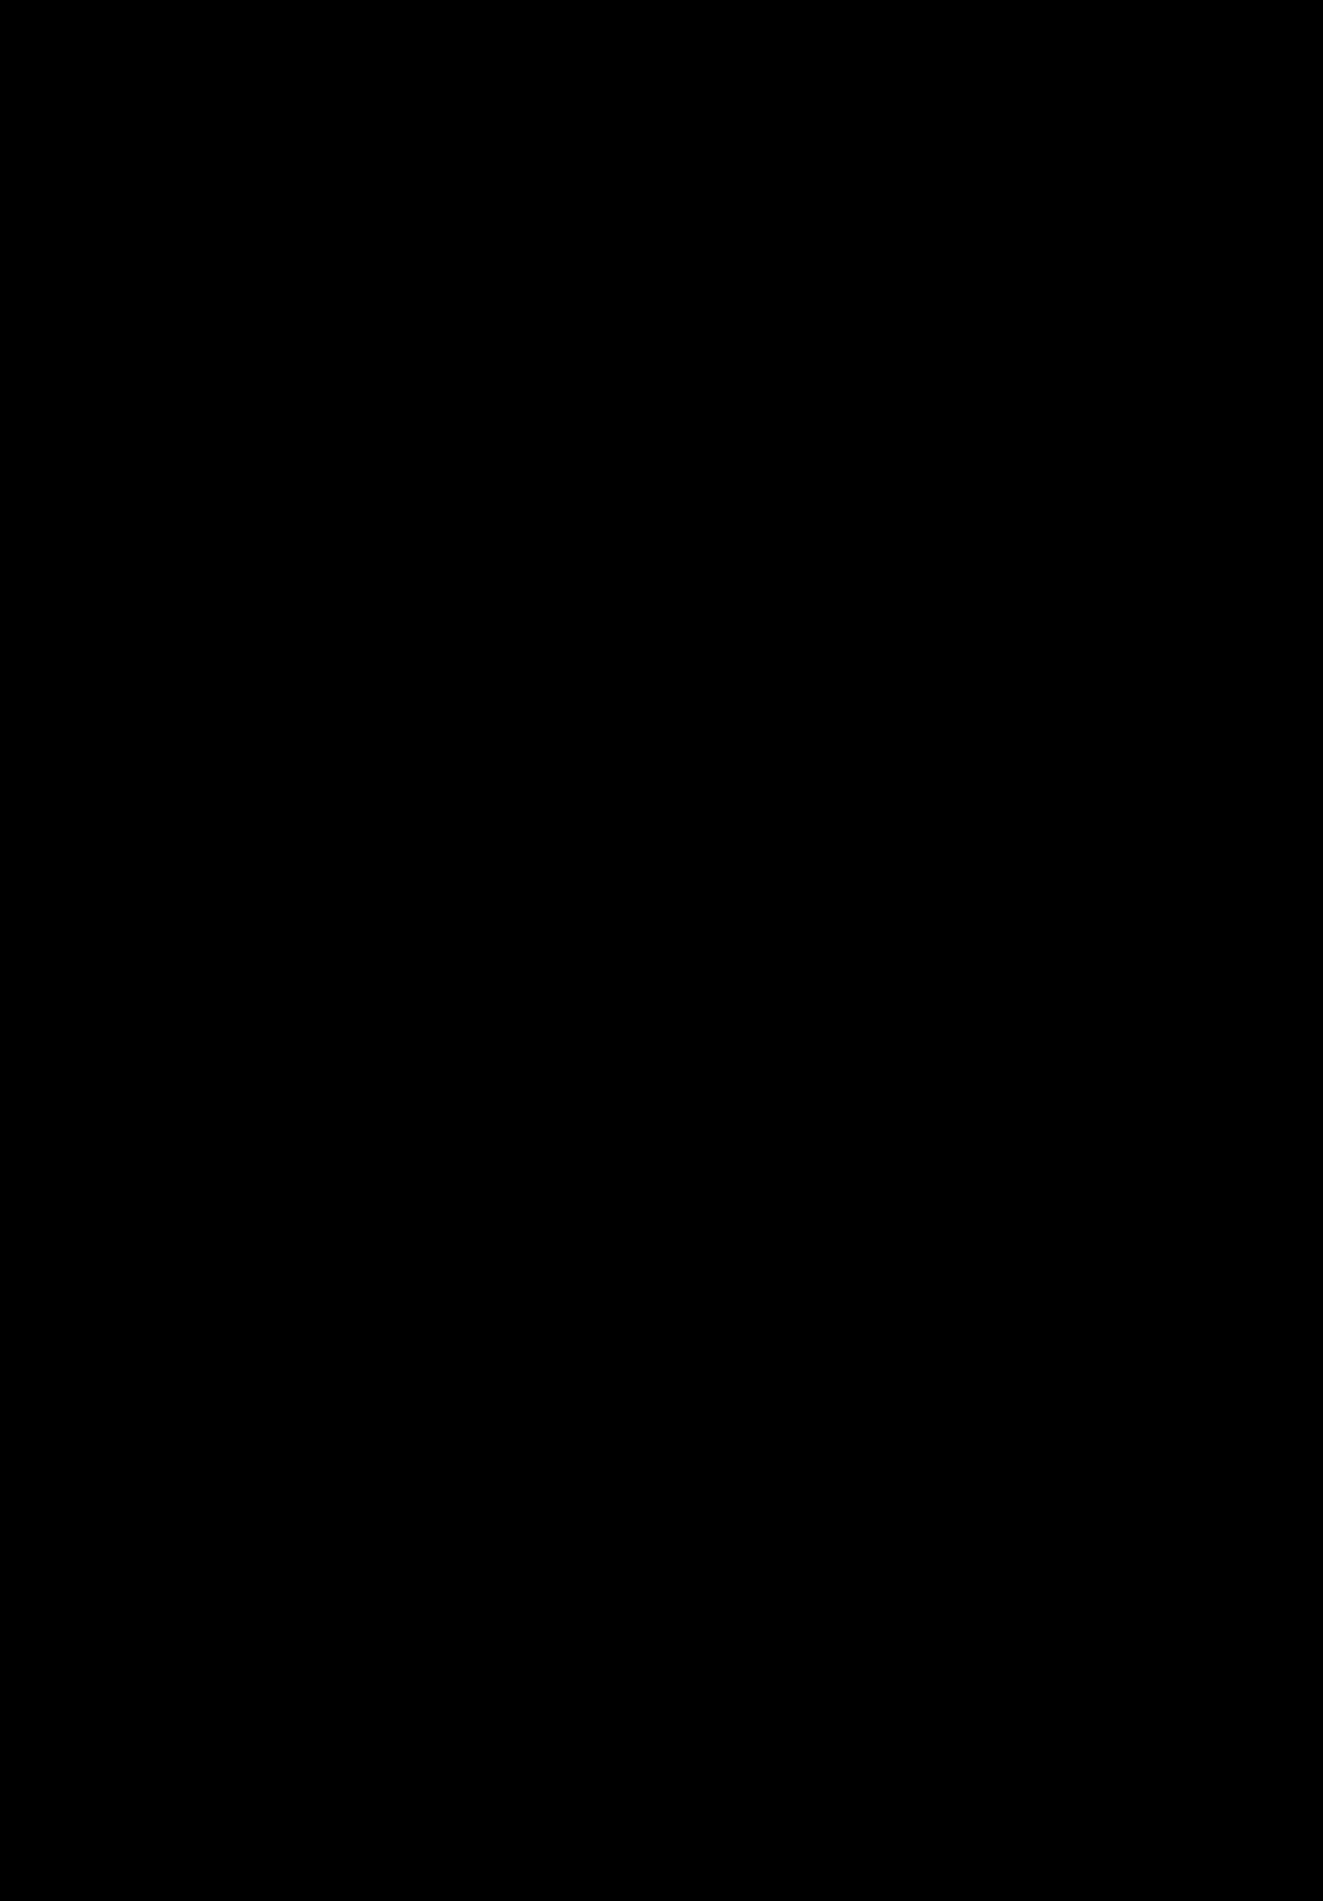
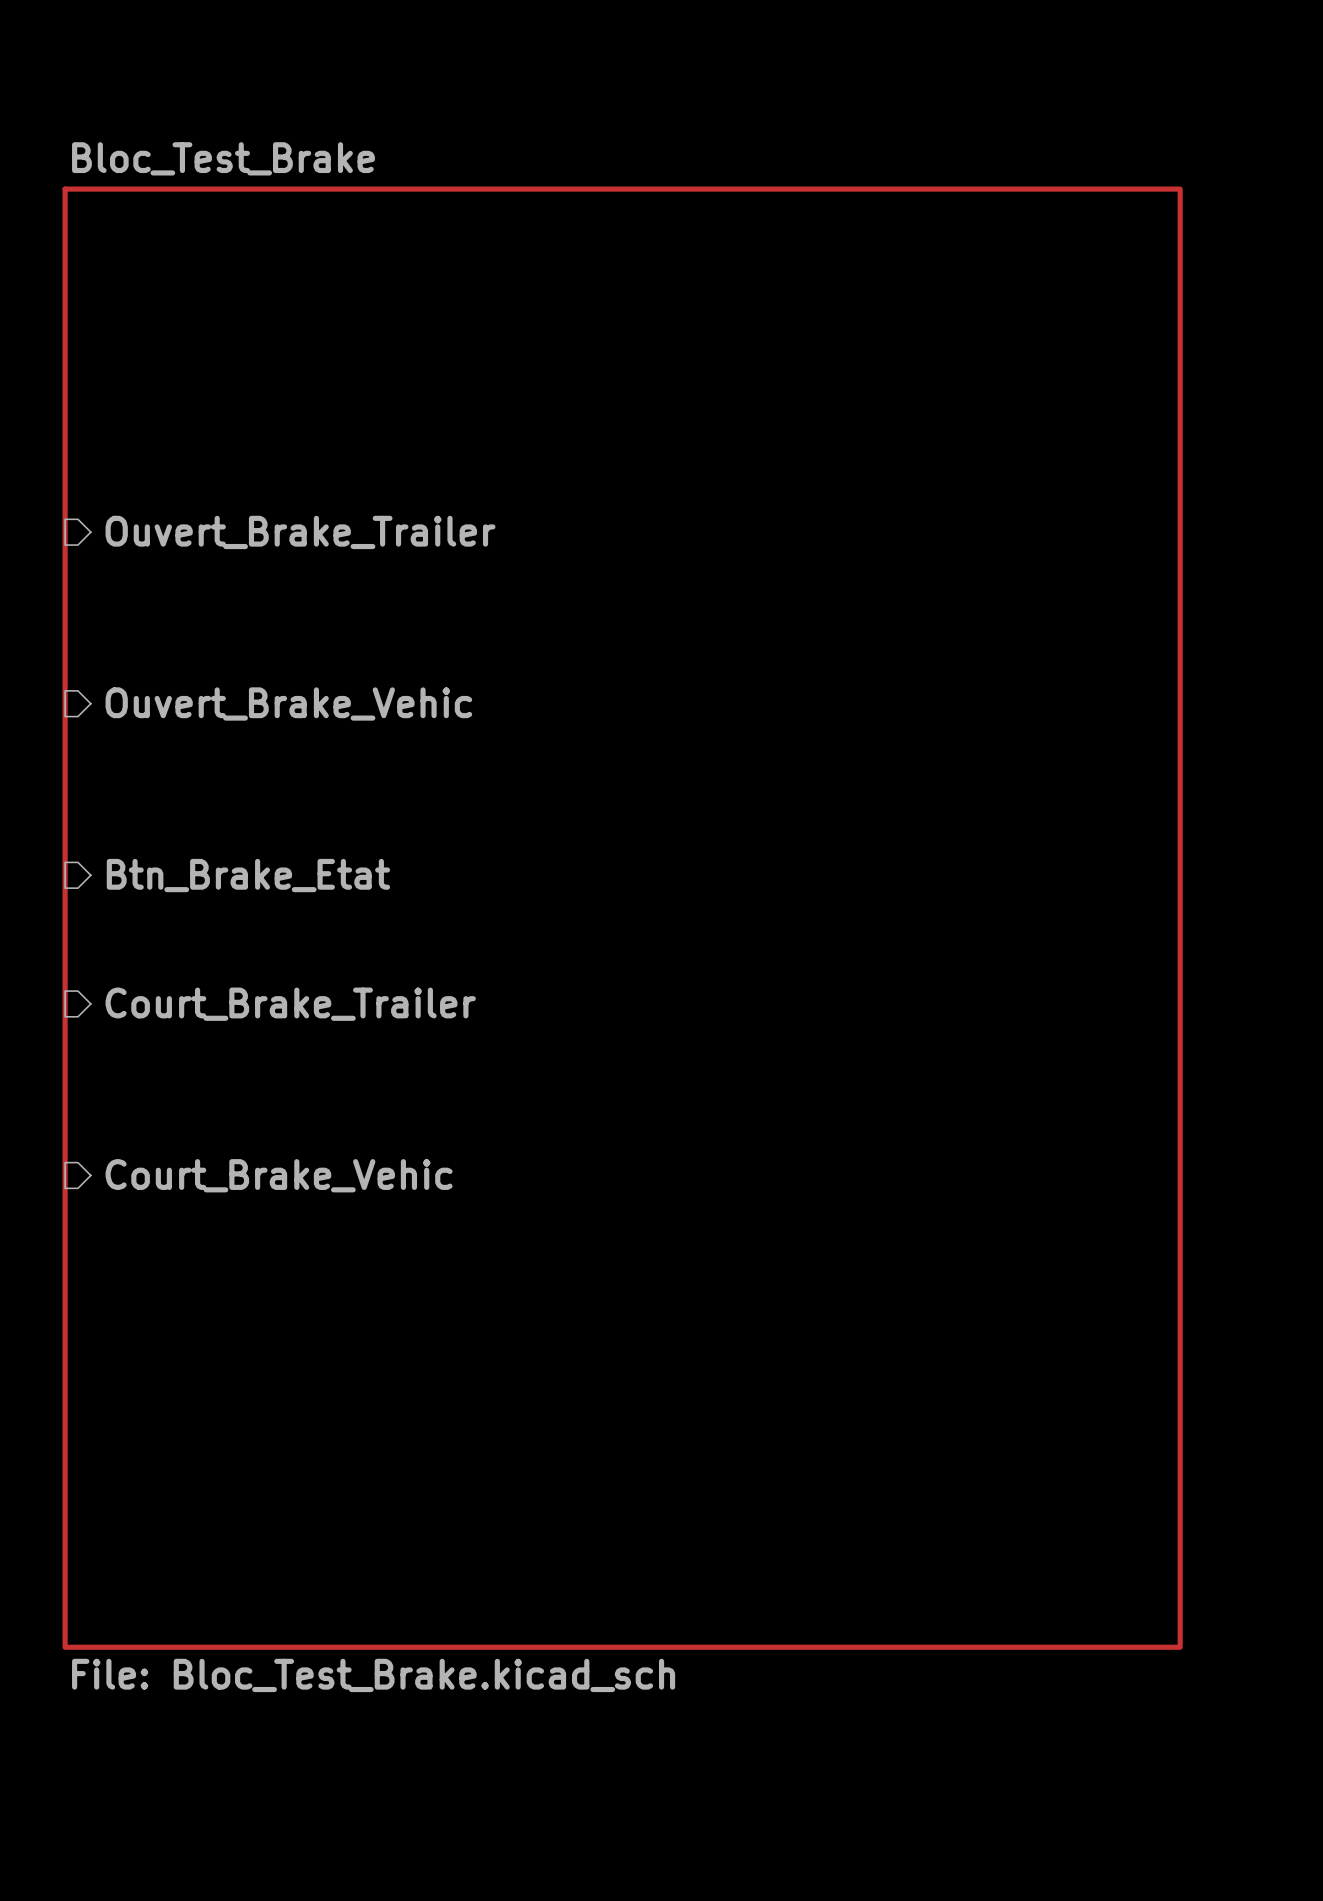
sheet pin: none -> Ouvert_Brake_Trailer (300, 532)
sheet pin: none -> Ouvert_Brake_Vehic (288, 703)
sheet pin: none -> Btn_Brake_Etat (248, 875)
sheet Bloc_Test_Brake: none -> File: Bloc_Test_Brake.kicad_sch (622, 918)
sheet pin: none -> Court_Brake_Trailer (290, 1004)
sheet pin: none -> Court_Brake_Vehic (279, 1175)

